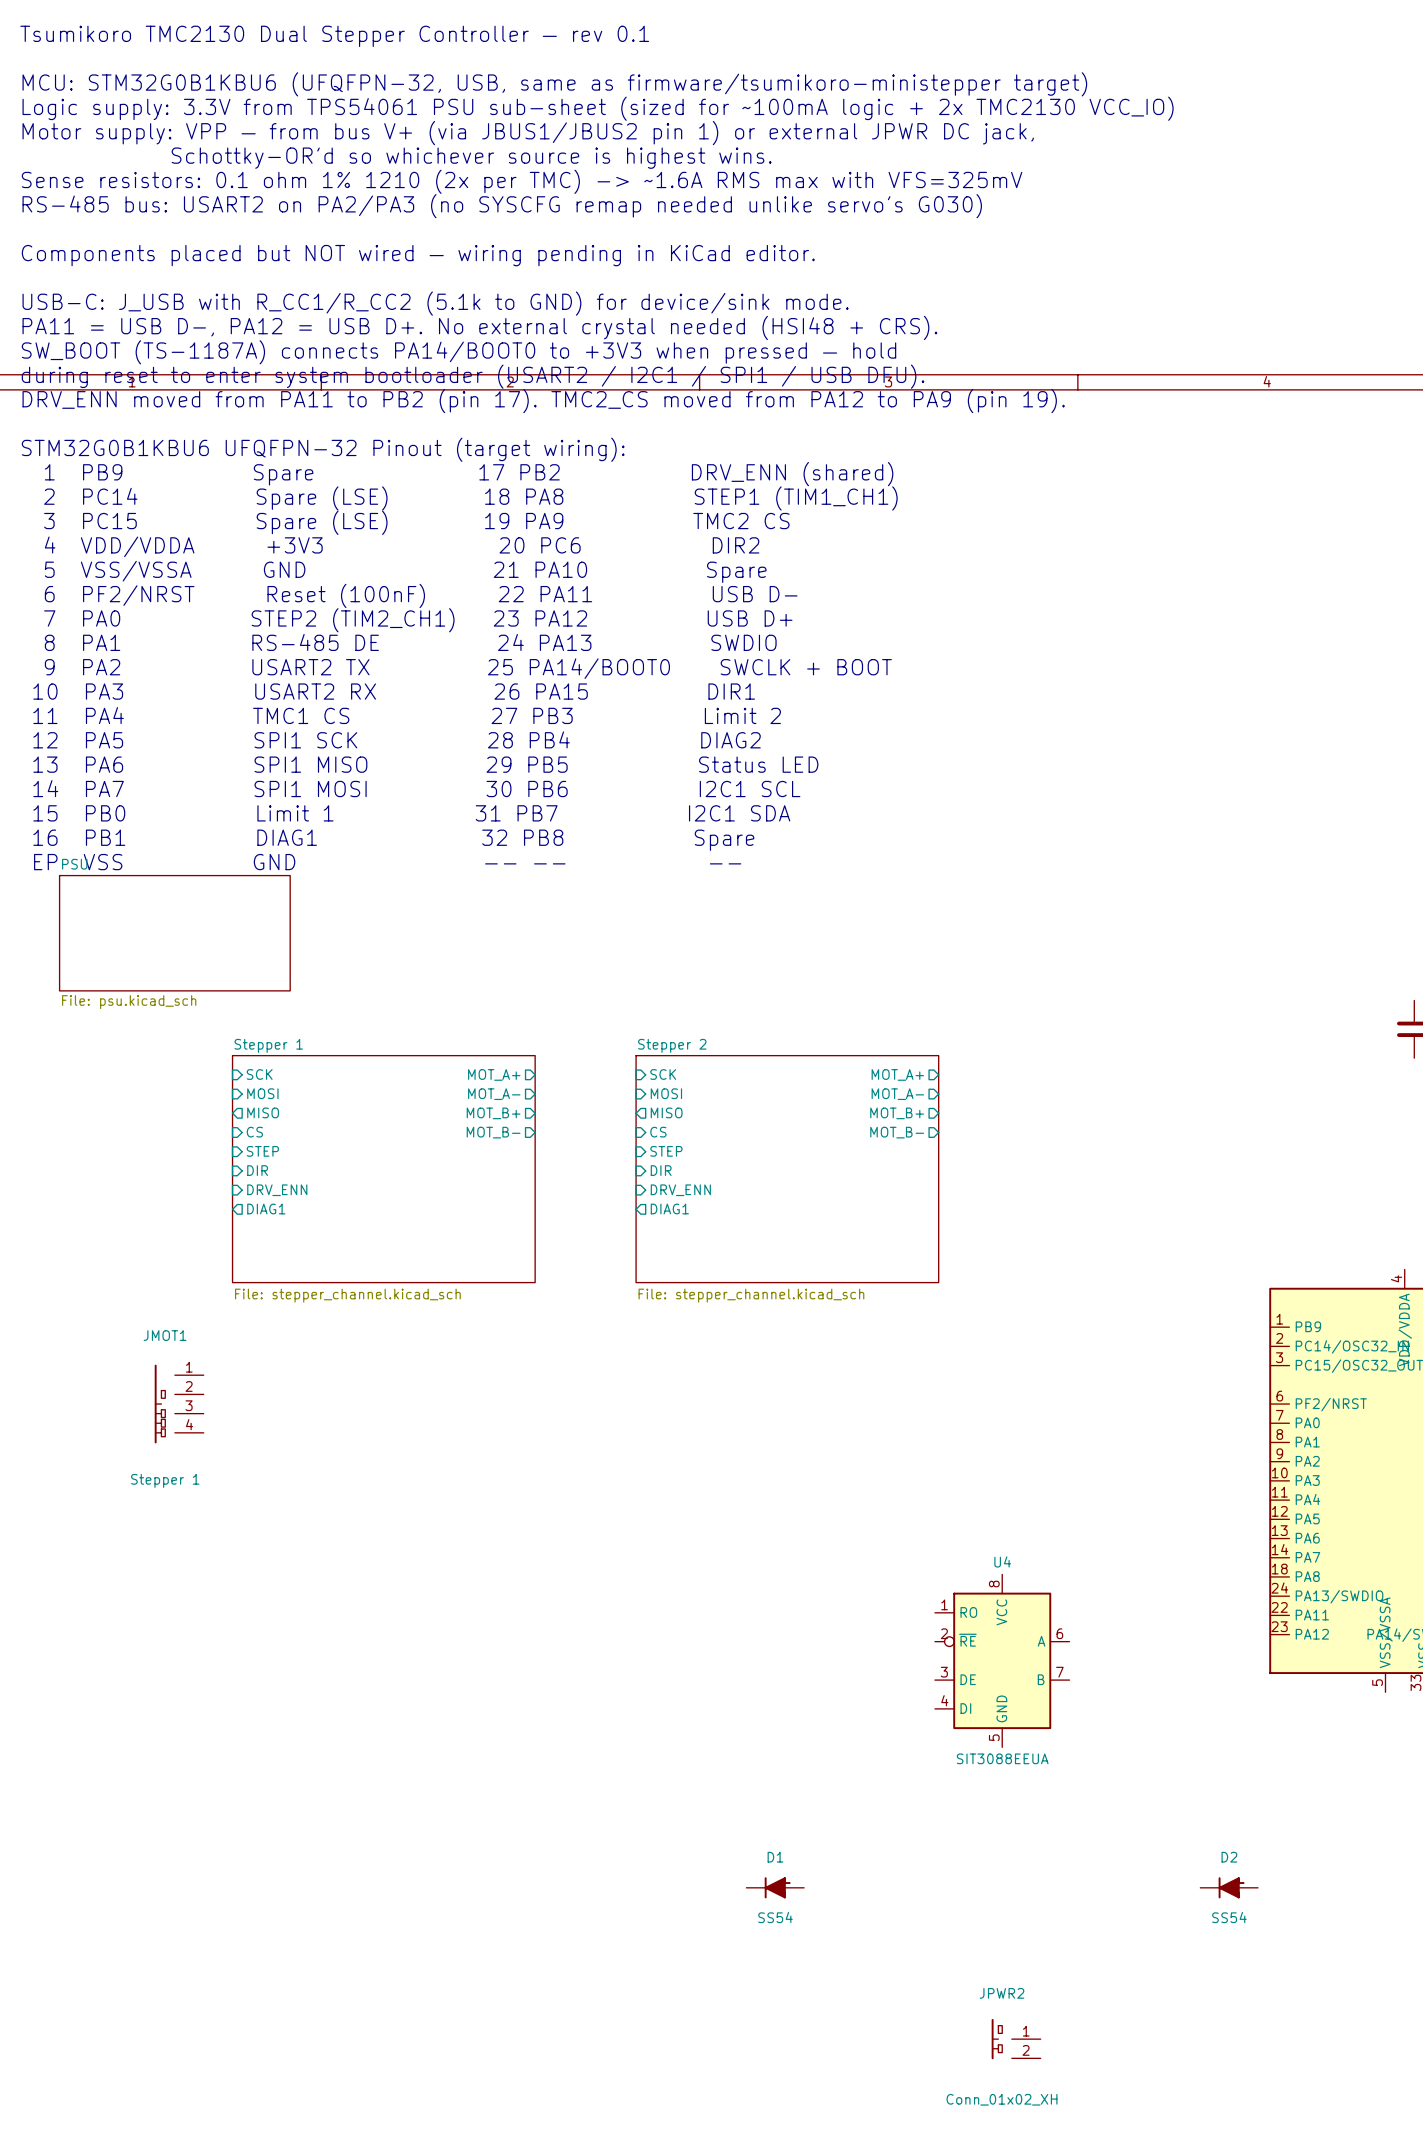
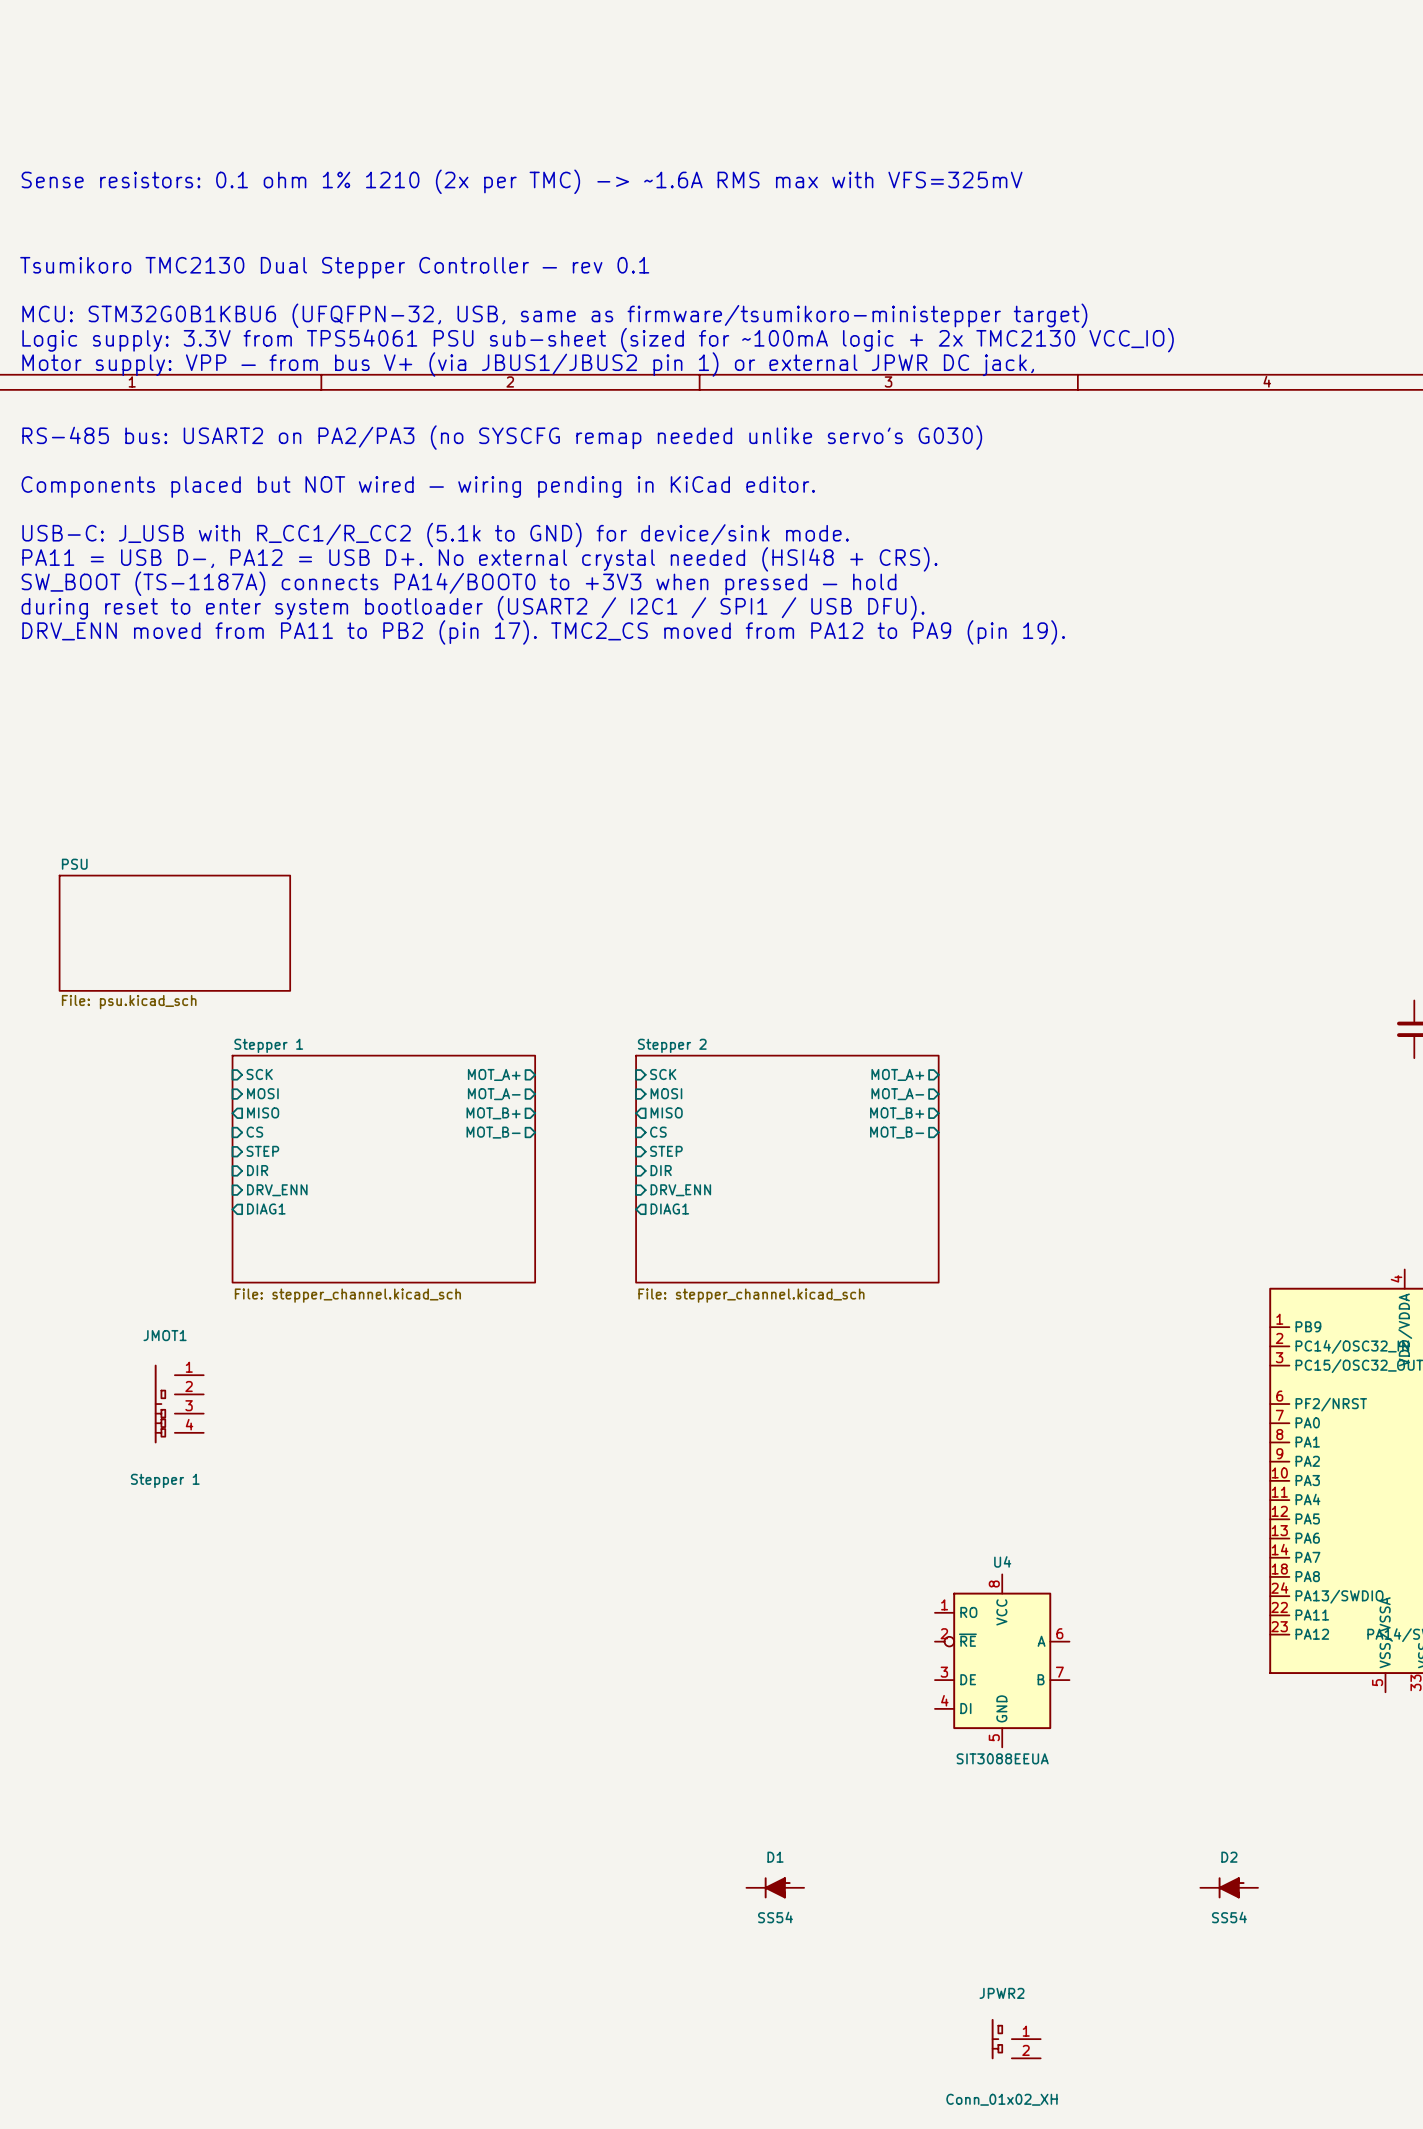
text: Tsumikoro TMC2130 Dual Stepper Controller — rev 0.1 (334, 36) -> none
text: MCU: STM32G0B1KBU6 (UFQFPN-32, USB, same as firmware/tsumikoro-ministepper target) (554, 84) -> none
text: Logic supply: 3.3V from TPS54061 PSU sub-sheet (sized for ~100mA logic + 2x TMC2130 VCC_IO) (598, 108) -> none
text: Motor supply: VPP — from bus V+ (via JBUS1/JBUS2 pin 1) or external JPWR DC jack, (528, 133) -> none
text: Schottky-OR'd so whichever source is highest wins. (471, 158) -> none
text: RS-485 bus: USART2 on PA2/PA3 (no SYSCFG remap needed unlike servo's G030) (502, 206) -> none
text: Components placed but NOT wired — wiring pending in KiCad editor. (418, 255) -> none
text: none -> Tsumikoro TMC2130 Dual Stepper Controller — rev 0.1 (334, 267)
text: USB-C: J_USB with R_CC1/R_CC2 (5.1k to GND) for device/sink mode. (435, 303) -> none
text: none -> MCU: STM32G0B1KBU6 (UFQFPN-32, USB, same as firmware/tsumikoro-ministepper target) (554, 315)
text: PA11 = USB D-, PA12 = USB D+. No external crystal needed (HSI48 + CRS). (479, 327) -> none
text: none -> Logic supply: 3.3V from TPS54061 PSU sub-sheet (sized for ~100mA logic + 2x TMC2130 VCC_IO) (598, 340)
text: SW_BOOT (TS-1187A) connects PA14/BOOT0 to +3V3 when pressed — hold (459, 352) -> none
text: none -> Motor supply: VPP — from bus V+ (via JBUS1/JBUS2 pin 1) or external JPWR DC jack, (528, 364)
text: during reset to enter system bootloader (USART2 / I2C1 / SPI1 / USB DFU). (473, 376) -> none
text: DRV_ENN moved from PA11 to PB2 (pin 17). TMC2_CS moved from PA12 to PA9 (pin 19). (543, 401) -> none
text: none -> RS-485 bus: USART2 on PA2/PA3 (no SYSCFG remap needed unlike servo's G030) (502, 437)
text: STM32G0B1KBU6 UFQFPN-32 Pinout (target wiring): (323, 449) -> none
text: 1 PB9 Spare 17 PB2 DRV_ENN (shared) (469, 474) -> none
text: none -> Components placed but NOT wired — wiring pending in KiCad editor. (418, 487)
text: 2 PC14 Spare (LSE) 18 PA8 STEP1 (TIM1_CH1) (470, 498) -> none
text: 3 PC15 Spare (LSE) 19 PA9 TMC2 CS (416, 522) -> none
text: none -> USB-C: J_USB with R_CC1/R_CC2 (5.1k to GND) for device/sink mode. (435, 535)
text: 4 VDD/VDDA +3V3 20 PC6 DIR2 (402, 546) -> none
text: none -> PA11 = USB D-, PA12 = USB D+. No external crystal needed (HSI48 + CRS). (479, 559)
text: 5 VSS/VSSA GND 21 PA10 Spare (405, 571) -> none
text: none -> SW_BOOT (TS-1187A) connects PA14/BOOT0 to +3V3 when pressed — hold (459, 583)
text: 6 PF2/NRST Reset (100nF) 22 PA11 USB D- (421, 595) -> none
text: none -> during reset to enter system bootloader (USART2 / I2C1 / SPI1 / USB DFU). (473, 608)
text: 7 PA0 STEP2 (TIM2_CH1) 23 PA12 USB D+ (418, 620) -> none
text: none -> DRV_ENN moved from PA11 to PB2 (pin 17). TMC2_CS moved from PA12 to PA9 (pin 19). (543, 632)
text: 8 PA1 RS-485 DE 24 PA13 SWDIO (410, 642) -> none
text: 9 PA2 USART2 TX 25 PA14/BOOT0 SWCLK + BOOT (468, 668) -> none
text: 10 PA3 USART2 RX 26 PA15 DIR1 (394, 691) -> none
text: 11 PA4 TMC1 CS 27 PB3 Limit 2 (407, 715) -> none
text: 12 PA5 SPI1 SCK 28 PB4 DIAG2 (397, 739) -> none
text: 13 PA6 SPI1 MISO 29 PB5 Status LED (425, 764) -> none
text: 14 PA7 SPI1 MOSI 30 PB6 I2C1 SCL (416, 788) -> none
text: 15 PB0 Limit 1 31 PB7 I2C1 SDA (411, 813) -> none
text: 16 PB1 DIAG1 32 PB8 Spare (393, 840) -> none
text: EP VSS GND -- -- -- (387, 862) -> none

